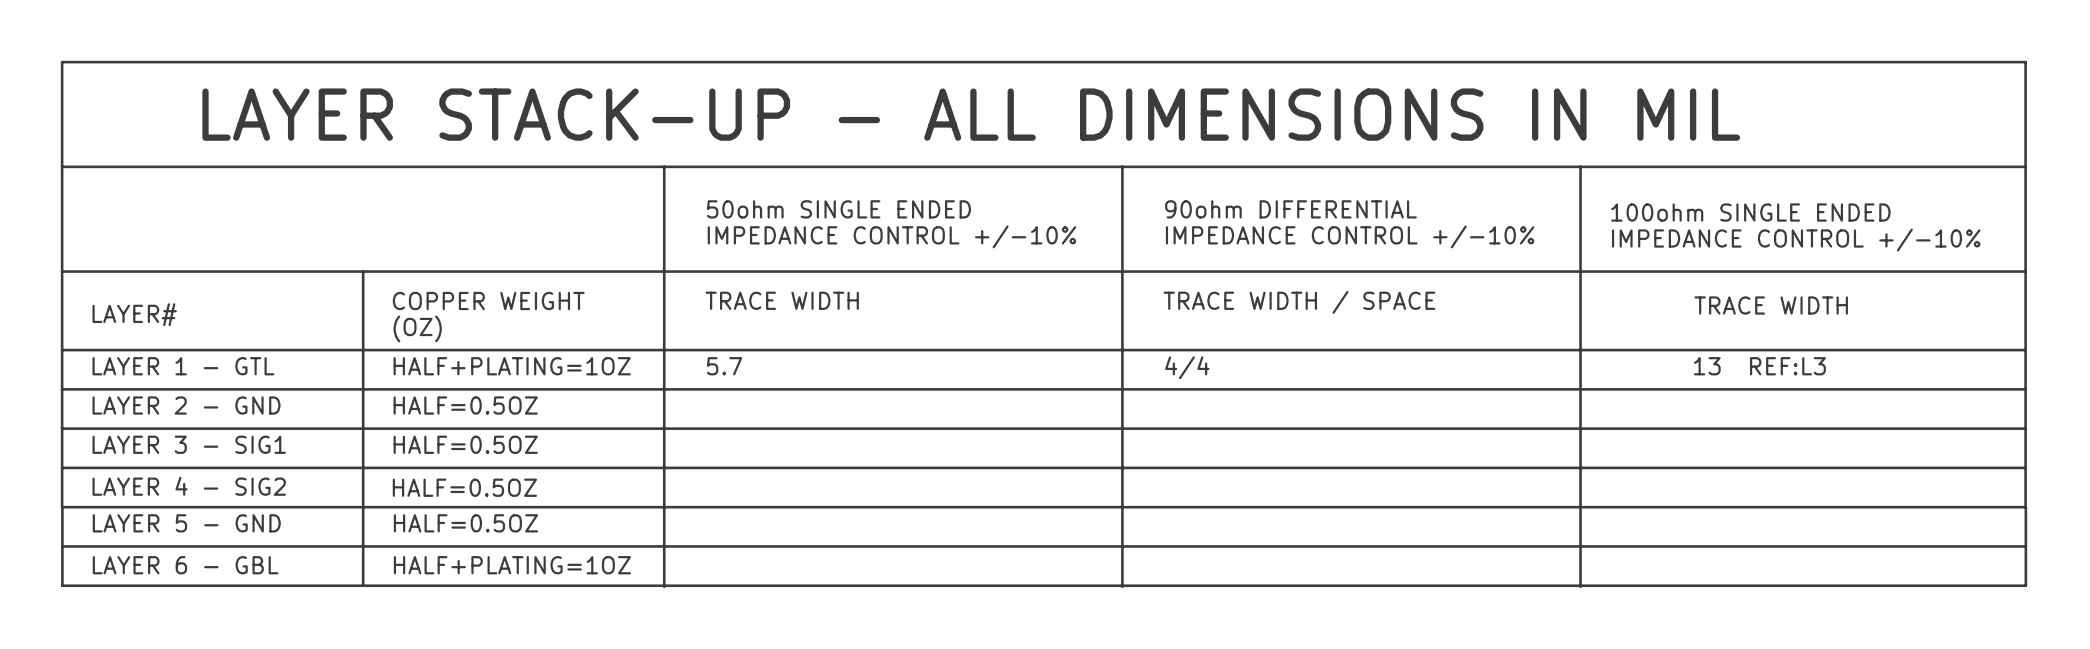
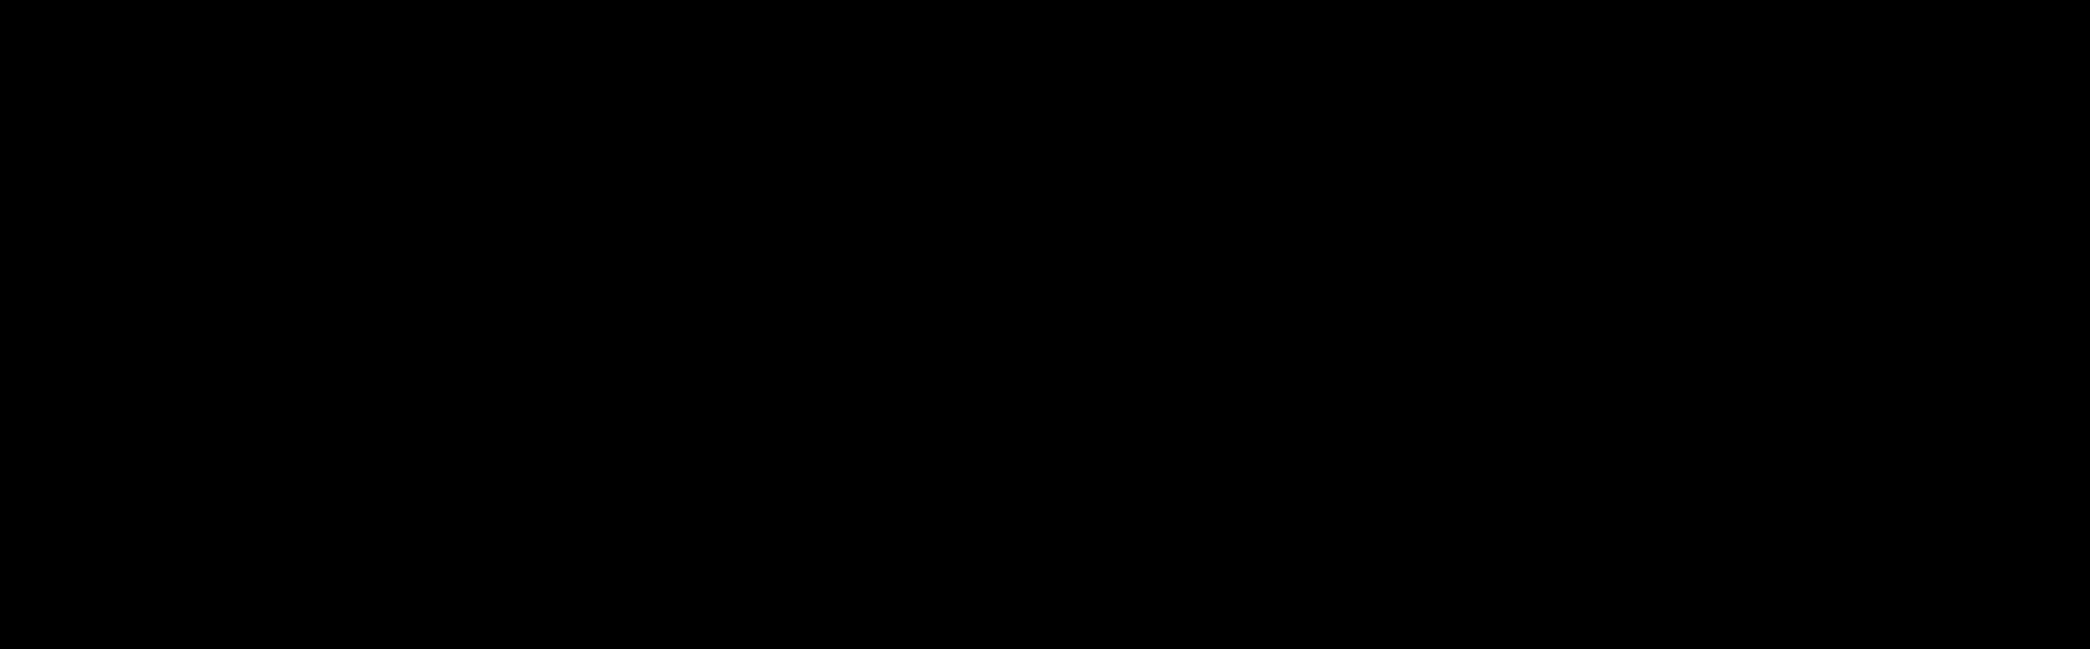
line: (62, 62) (62, 507) (2025, 507) (2025, 62) (62, 62) -> none
text: LAYER STACK-UP - ALL DIMENSIONS IN MIL (971, 114) -> none
line: (62, 166) (2025, 166) -> none
line: (664, 166) (664, 586) -> none
line: (1122, 166) (1122, 586) -> none
line: (1580, 166) (1580, 586) -> none
text: 50ohm SINGLE ENDED (838, 209) -> none
text: 90ohm DIFFERENTIAL (1290, 209) -> none
text: 100ohm SINGLE ENDED (1750, 212) -> none
text: IMPEDANCE CONTROL +/-10% (891, 236) -> none
text: IMPEDANCE CONTROL +/-10% (1350, 236) -> none
text: IMPEDANCE CONTROL +/-10% (1796, 240) -> none
line: (62, 271) (2025, 271) -> none
line: (363, 271) (363, 584) -> none
text: TRACE WIDTH (782, 300) -> none
text: COPPER WEIGHT (488, 301) -> none
text: TRACE WIDTH / SPACE (1299, 302) -> none
text: TRACE WIDTH (1771, 305) -> none
text: LAYER# (134, 314) -> none
text: (OZ) (417, 328) -> none
line: (62, 350) (2025, 350) -> none
text: LAYER 1 - GTL (183, 366) -> none
text: HALF+PLATING=1OZ (512, 366) -> none
text: 5.7 (724, 366) -> none
text: 13 REF:L3 (1759, 366) -> none
text: 4/4 (1187, 367) -> none
line: (62, 389) (2025, 389) -> none
text: LAYER 2 - GND (186, 405) -> none
text: HALF=0.5OZ (465, 405) -> none
line: (62, 428) (2025, 428) -> none
text: LAYER 3 - SIG1 (189, 444) -> none
text: HALF=0.5OZ (465, 444) -> none
line: (62, 467) (2025, 467) -> none
text: LAYER 4 - SIG2 (189, 486) -> none
text: HALF=0.5OZ (464, 487) -> none
line: (62, 507) (62, 585) (2025, 585) (2025, 507) -> none
text: LAYER 5 - GND (186, 523) -> none
text: HALF=0.5OZ (465, 523) -> none
line: (62, 546) (2025, 546) -> none
text: LAYER 6 - GBL (185, 565) -> none
text: HALF+PLATING=1OZ (512, 565) -> none

